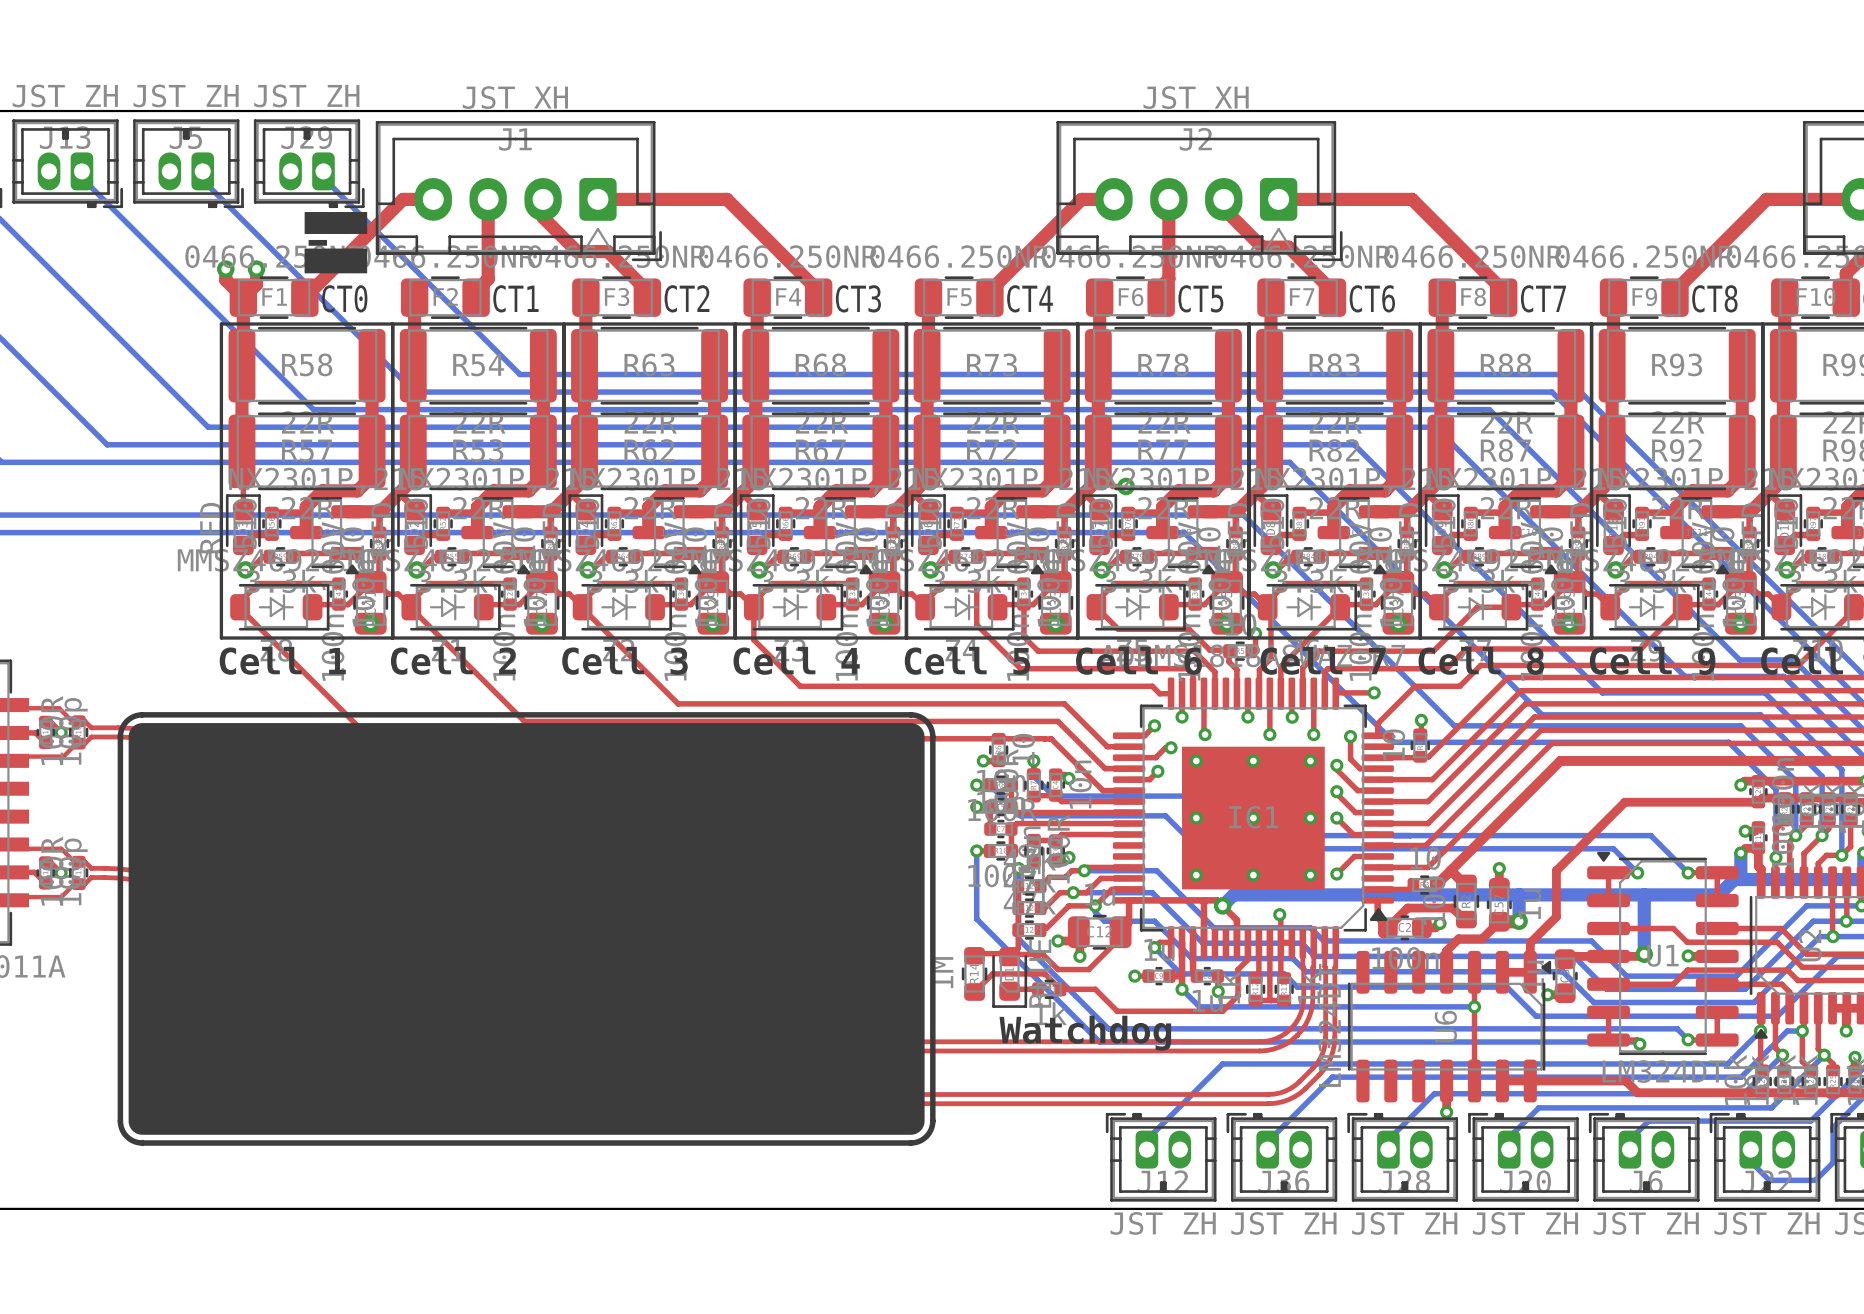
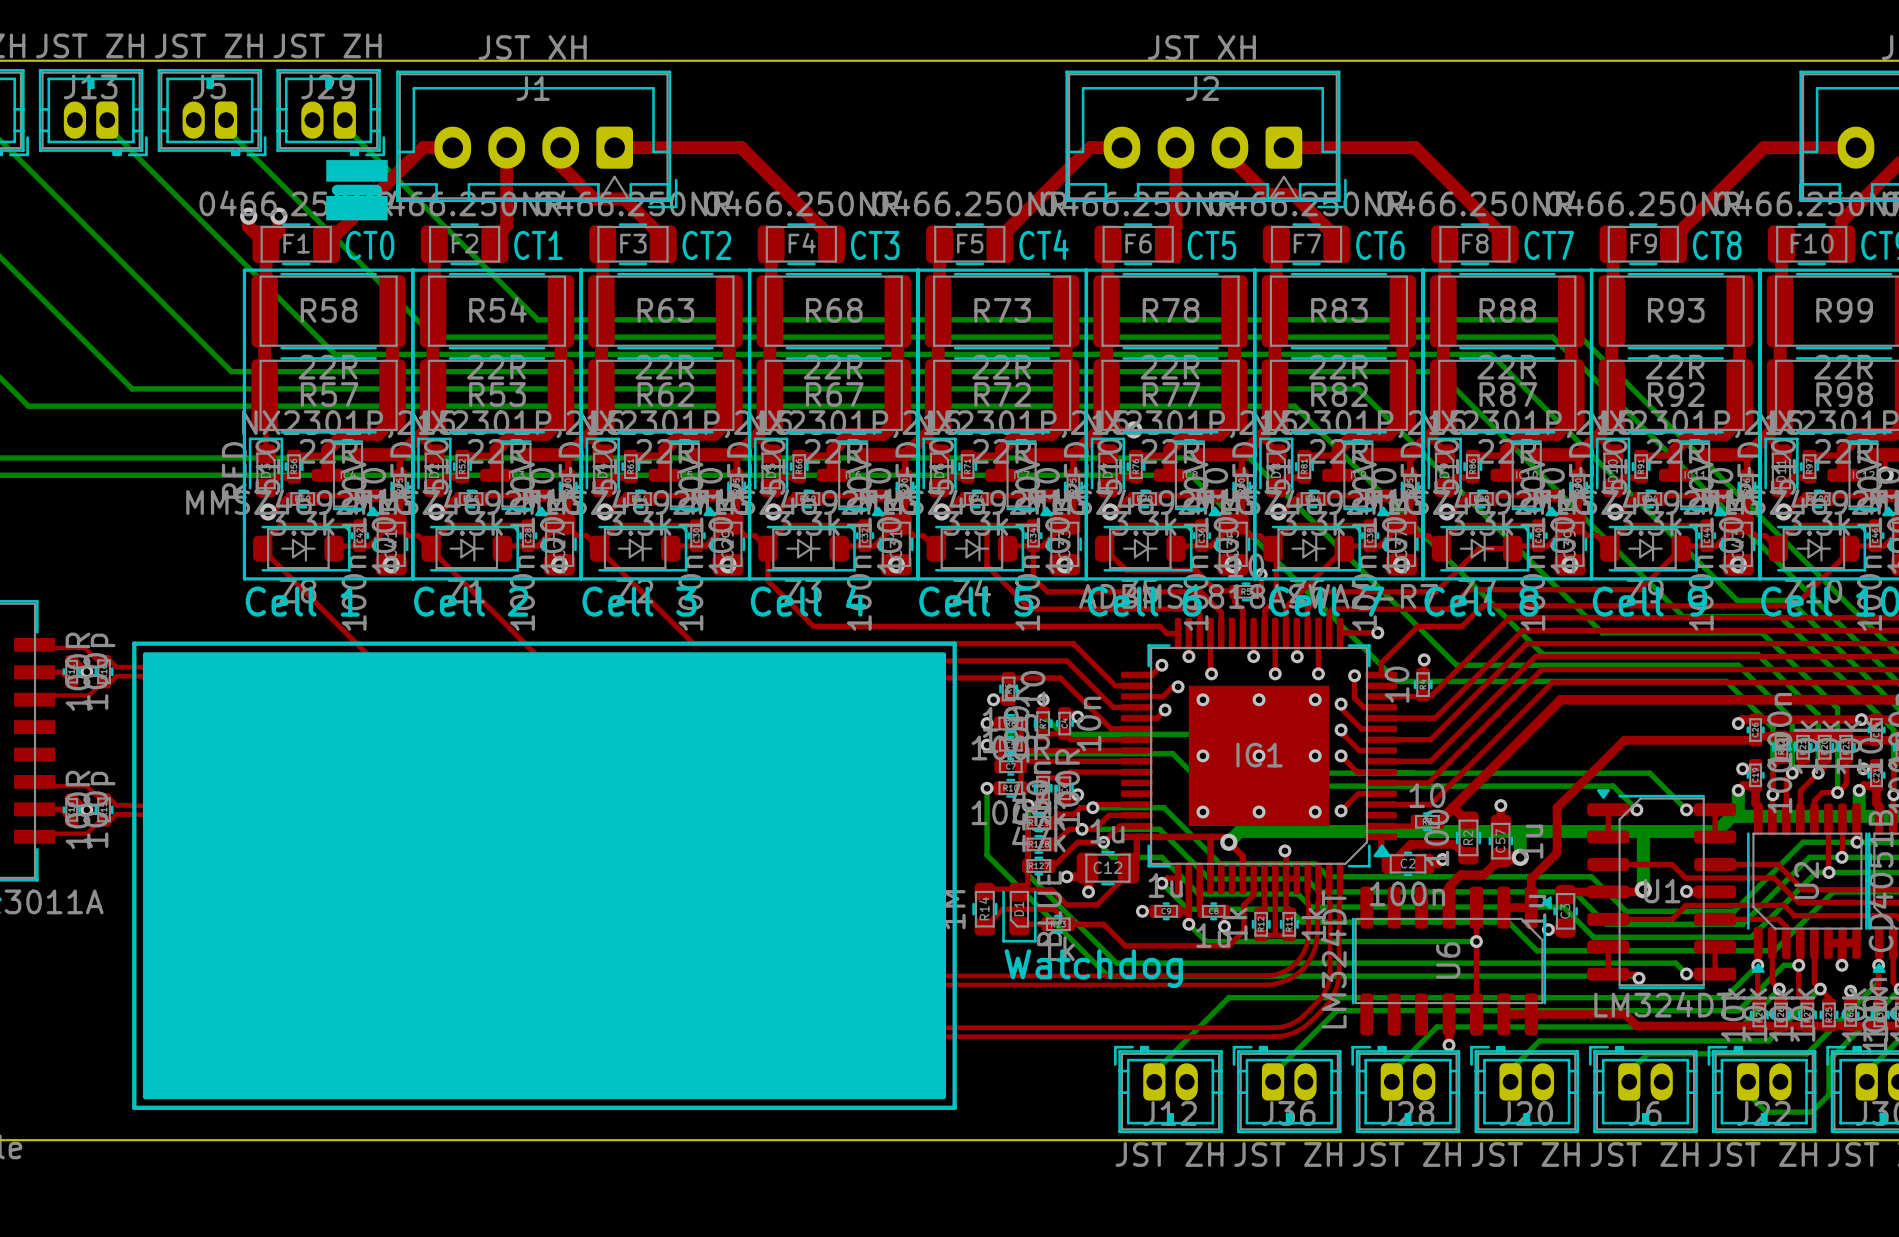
line: (142, 714) (910, 714) (920, 717) (929, 725) (932, 736) (932, 1121) (930, 1130) (922, 1139) (910, 1143) (142, 1143) (132, 1140) (123, 1132) (120, 1121) (120, 736) (122, 727) (126, 721) (135, 716) (142, 714) -> (134, 643) (134, 1107) (954, 1107) (954, 643) (134, 643)
drawing shape: [128, 723, 925, 1135] -> [142, 652, 947, 1100]

